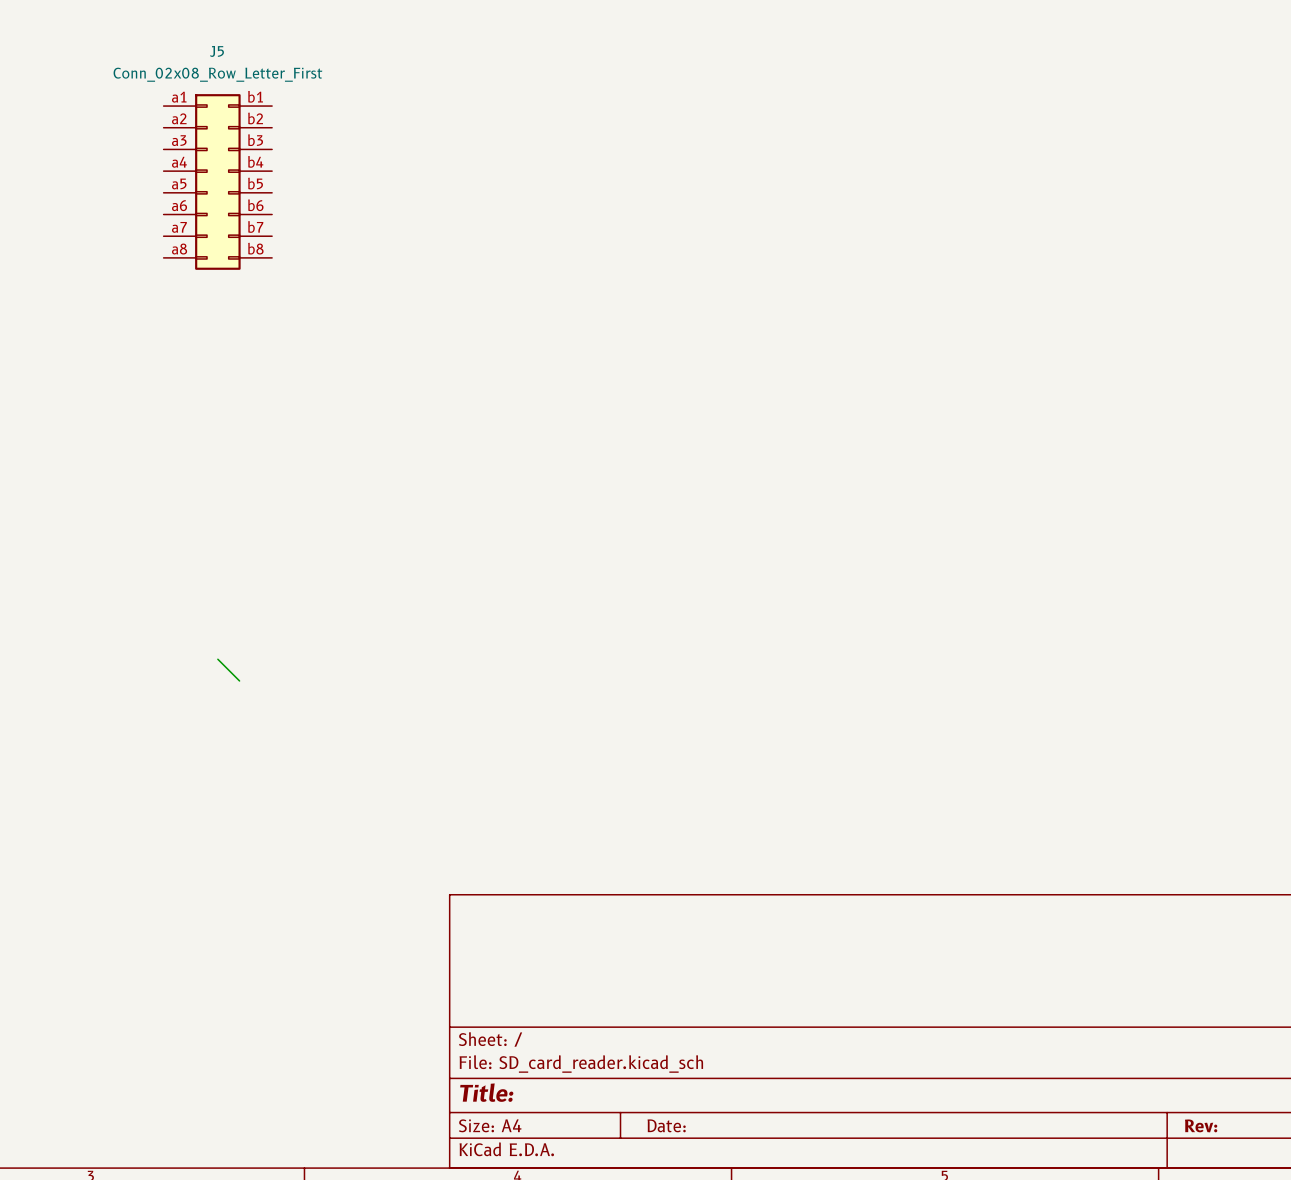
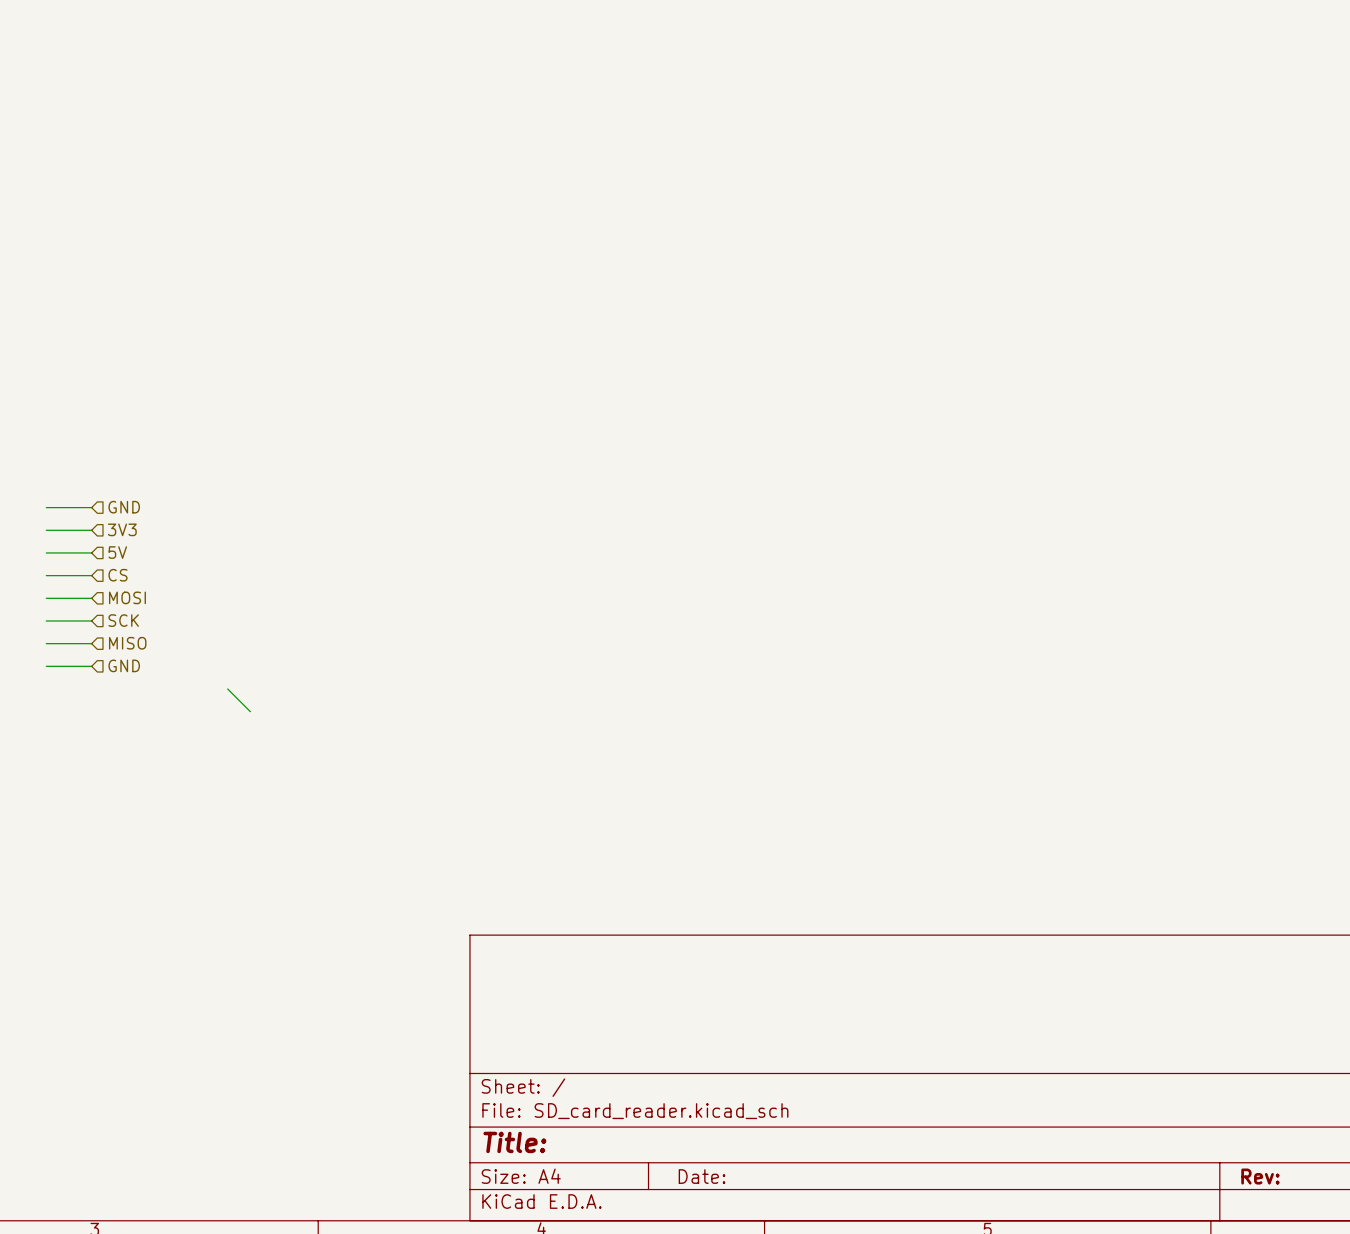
J5: Conn_02x08_Row_Letter_First (217, 181) -> none
wire: none -> (46, 507) (91, 507)
hierarchical label: none -> GND (124, 507)
wire: none -> (46, 530) (91, 530)
hierarchical label: none -> 3V3 (122, 529)
hierarchical label: none -> 5V (117, 552)
wire: none -> (46, 552) (91, 552)
wire: none -> (46, 575) (91, 575)
hierarchical label: none -> CS (118, 575)
wire: none -> (46, 598) (91, 598)
hierarchical label: none -> MOSI (127, 597)
hierarchical label: none -> SCK (123, 620)
wire: none -> (46, 620) (91, 620)
wire: none -> (46, 643) (91, 643)
hierarchical label: none -> MISO (127, 643)
wire: none -> (46, 666) (91, 666)
hierarchical label: none -> GND (124, 665)

